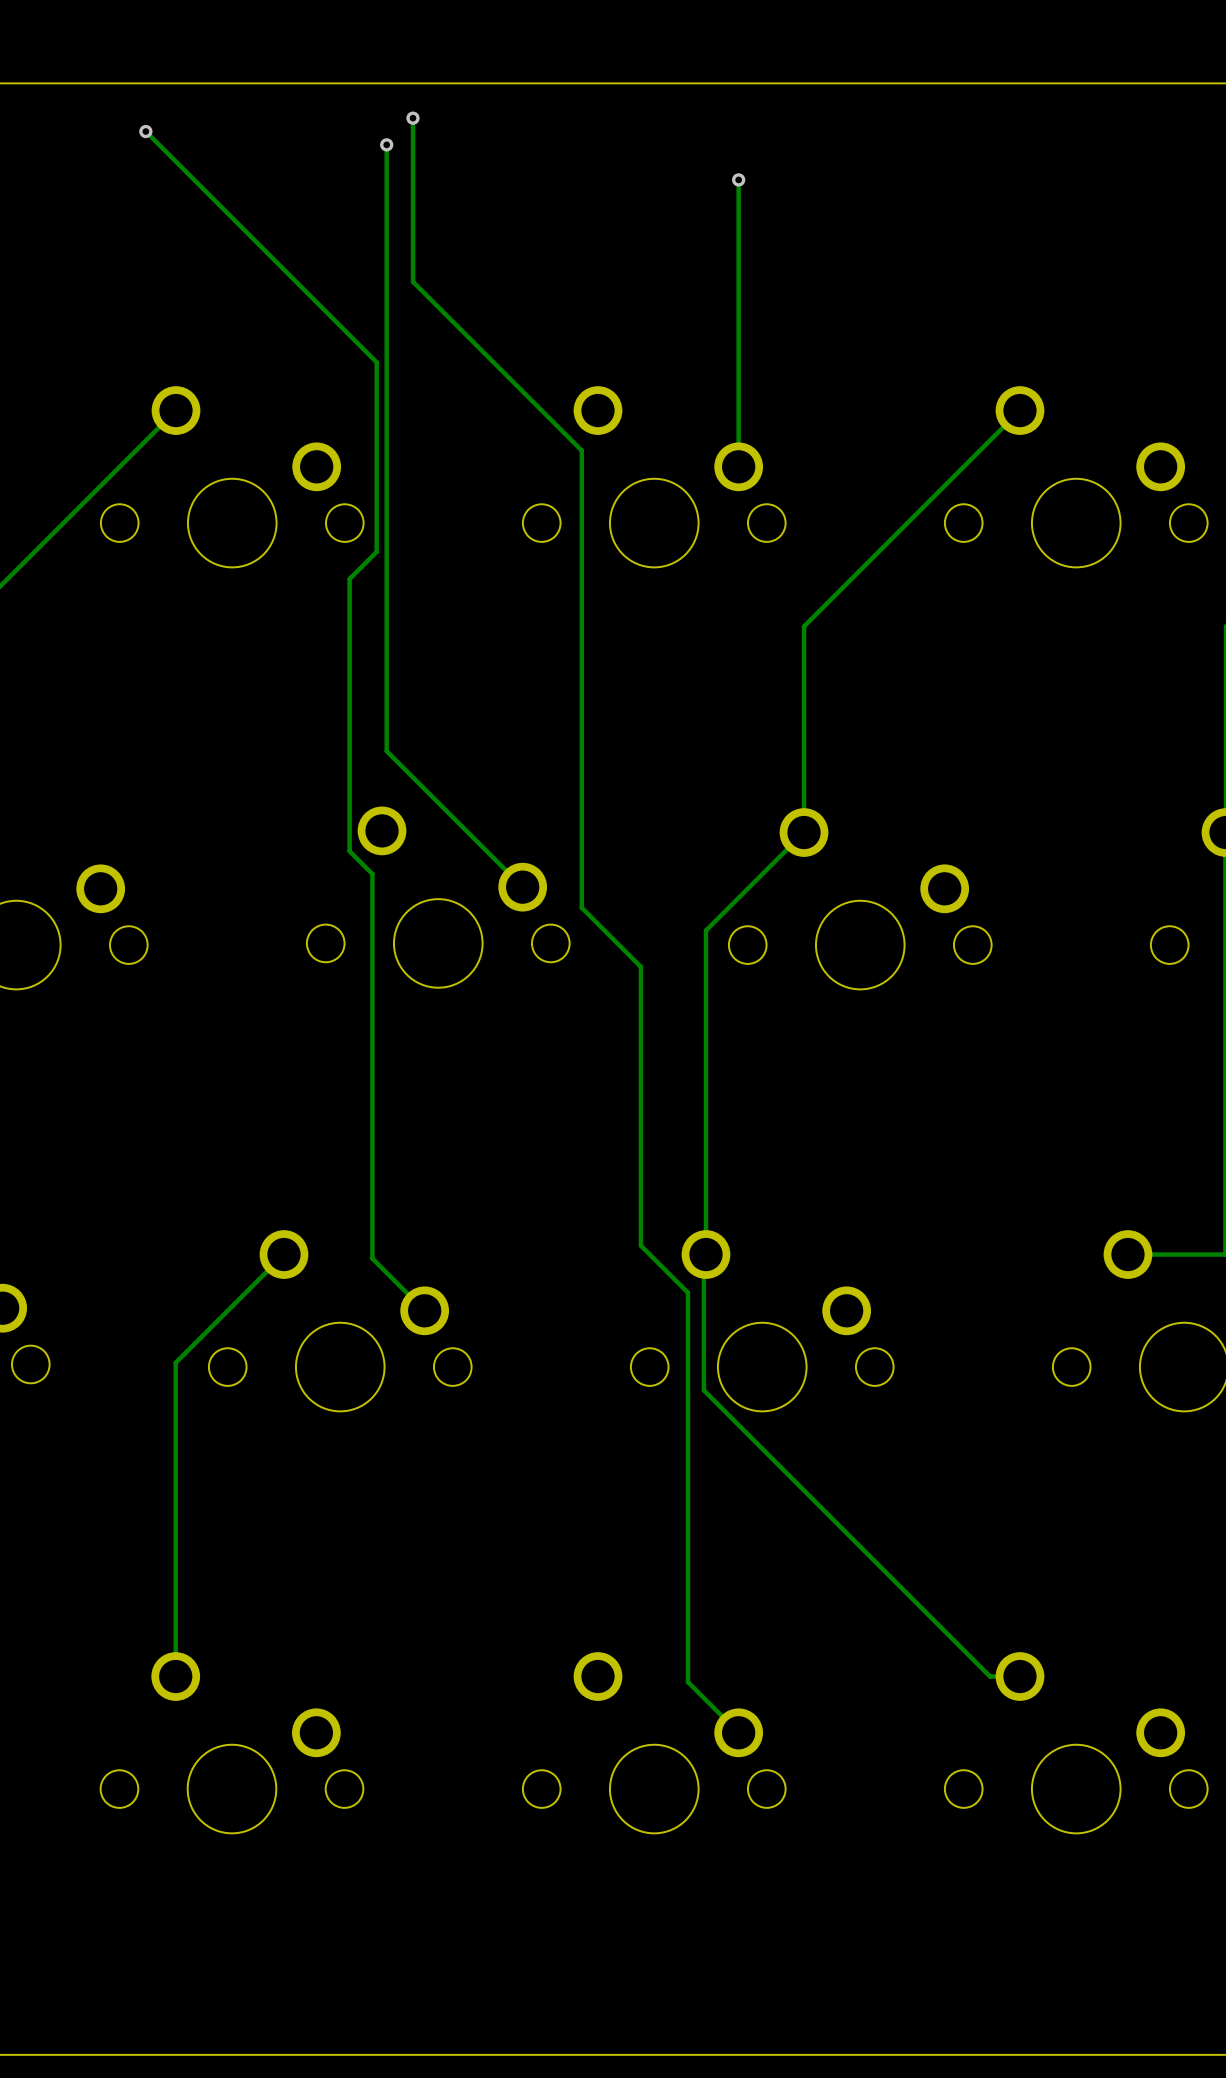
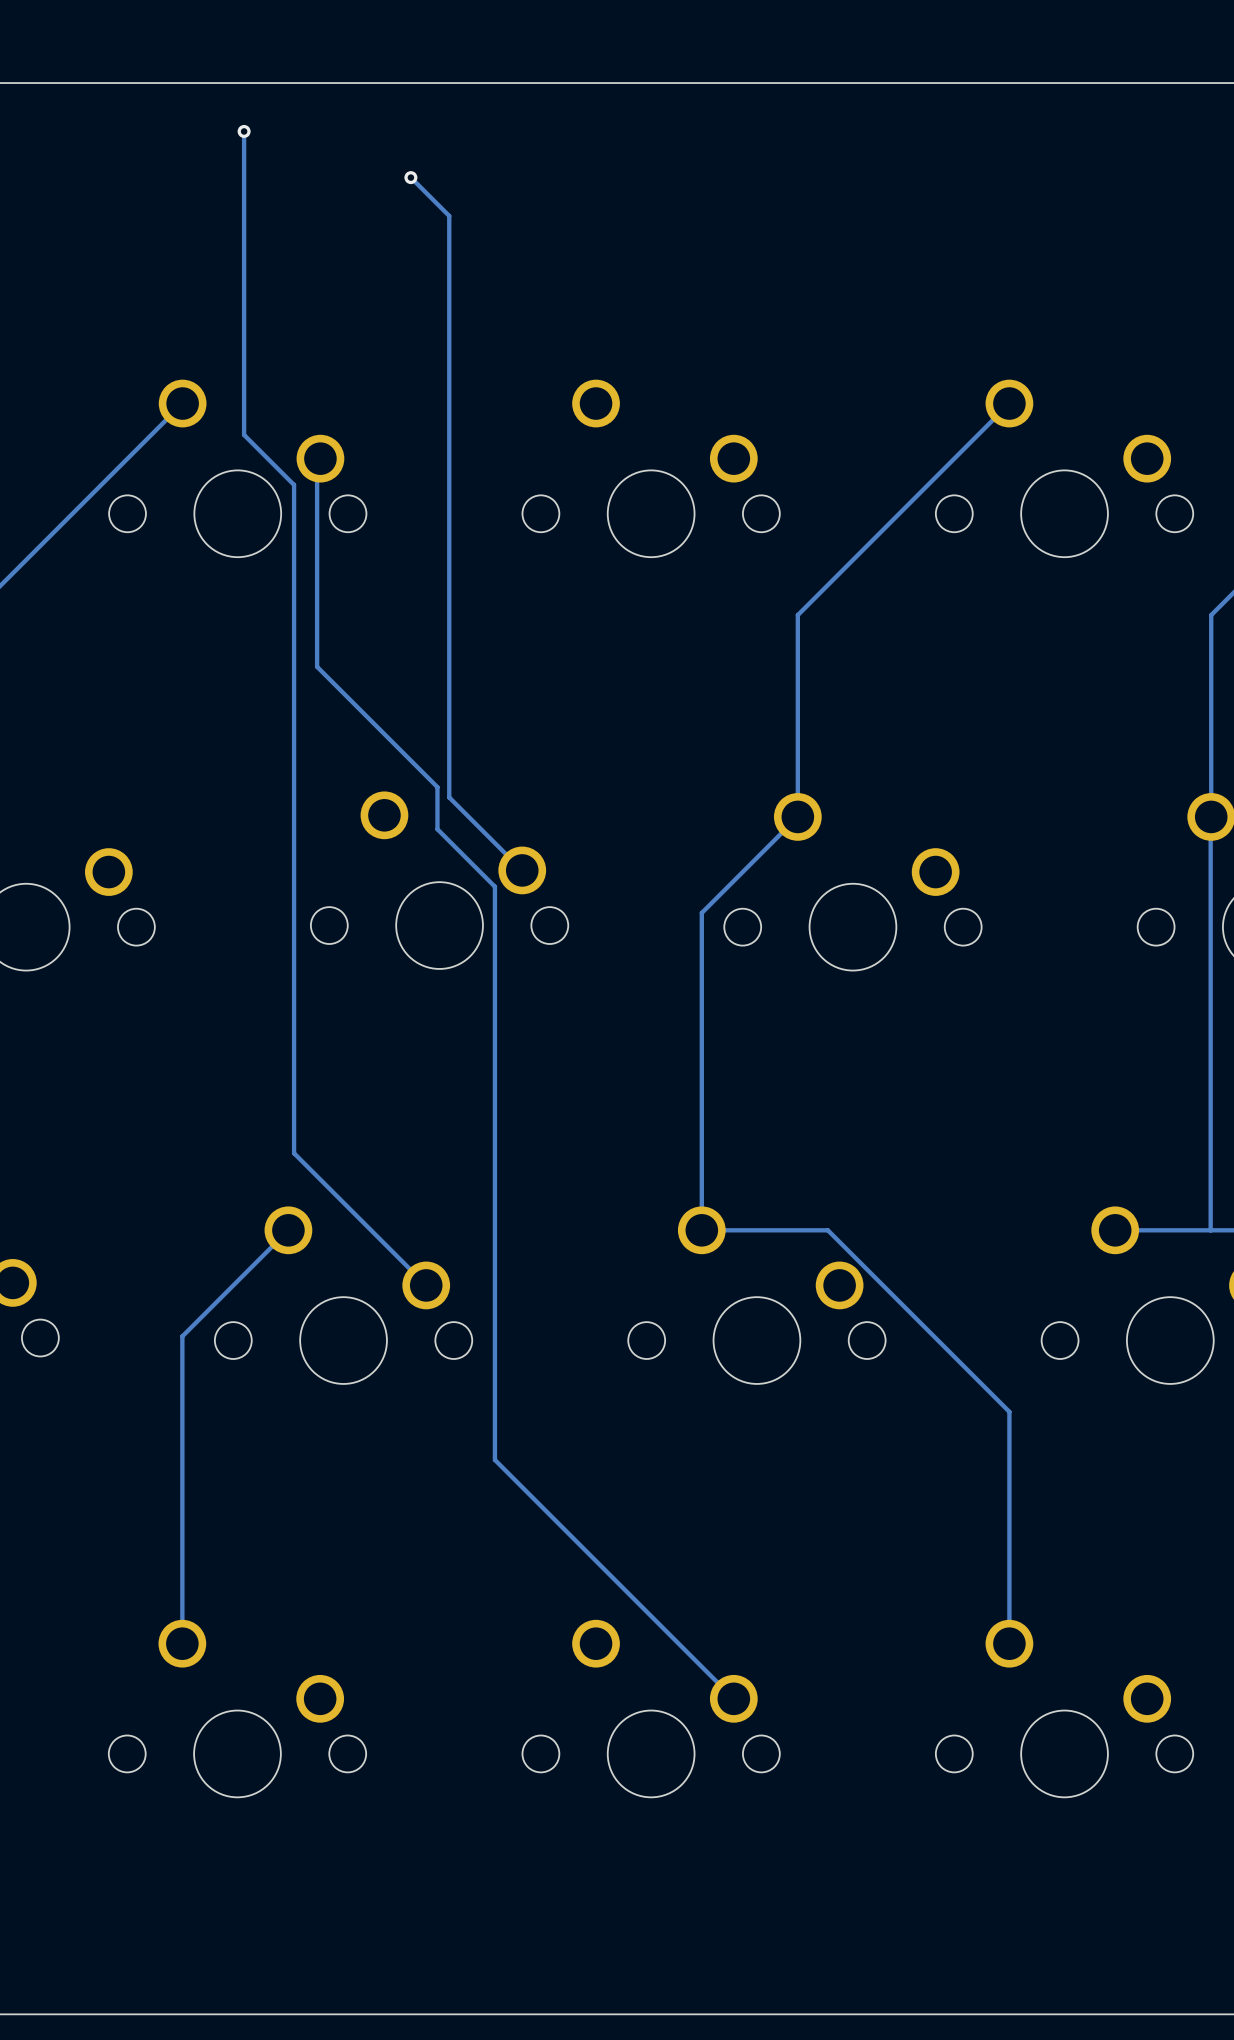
track: (412, 118) (412, 281) (581, 450) (581, 907) (640, 966) (640, 1245) (687, 1292) (687, 1682) -> (320, 458) (317, 461) (317, 666) (437, 787) (437, 829) (494, 886) (494, 1459) (684, 1649)
via: (412, 118) -> none
track: (145, 131) (376, 362) (376, 551) (349, 578) (349, 851) (372, 874) (372, 1258) -> (244, 131) (244, 434) (294, 484) (294, 1153) (375, 1234)
via: (145, 131) -> none
via: none -> (244, 131)
track: (386, 144) (386, 751) (448, 812) -> (410, 177) (449, 215) (449, 797)
via: (386, 144) -> none
via: none -> (410, 177)
track: (738, 179) (738, 466) -> none
via: (738, 179) -> none
track: (705, 1254) (703, 1256) (703, 1390) (990, 1676) (1019, 1676) -> (701, 1230) (827, 1230) (1009, 1411) (1009, 1643)

